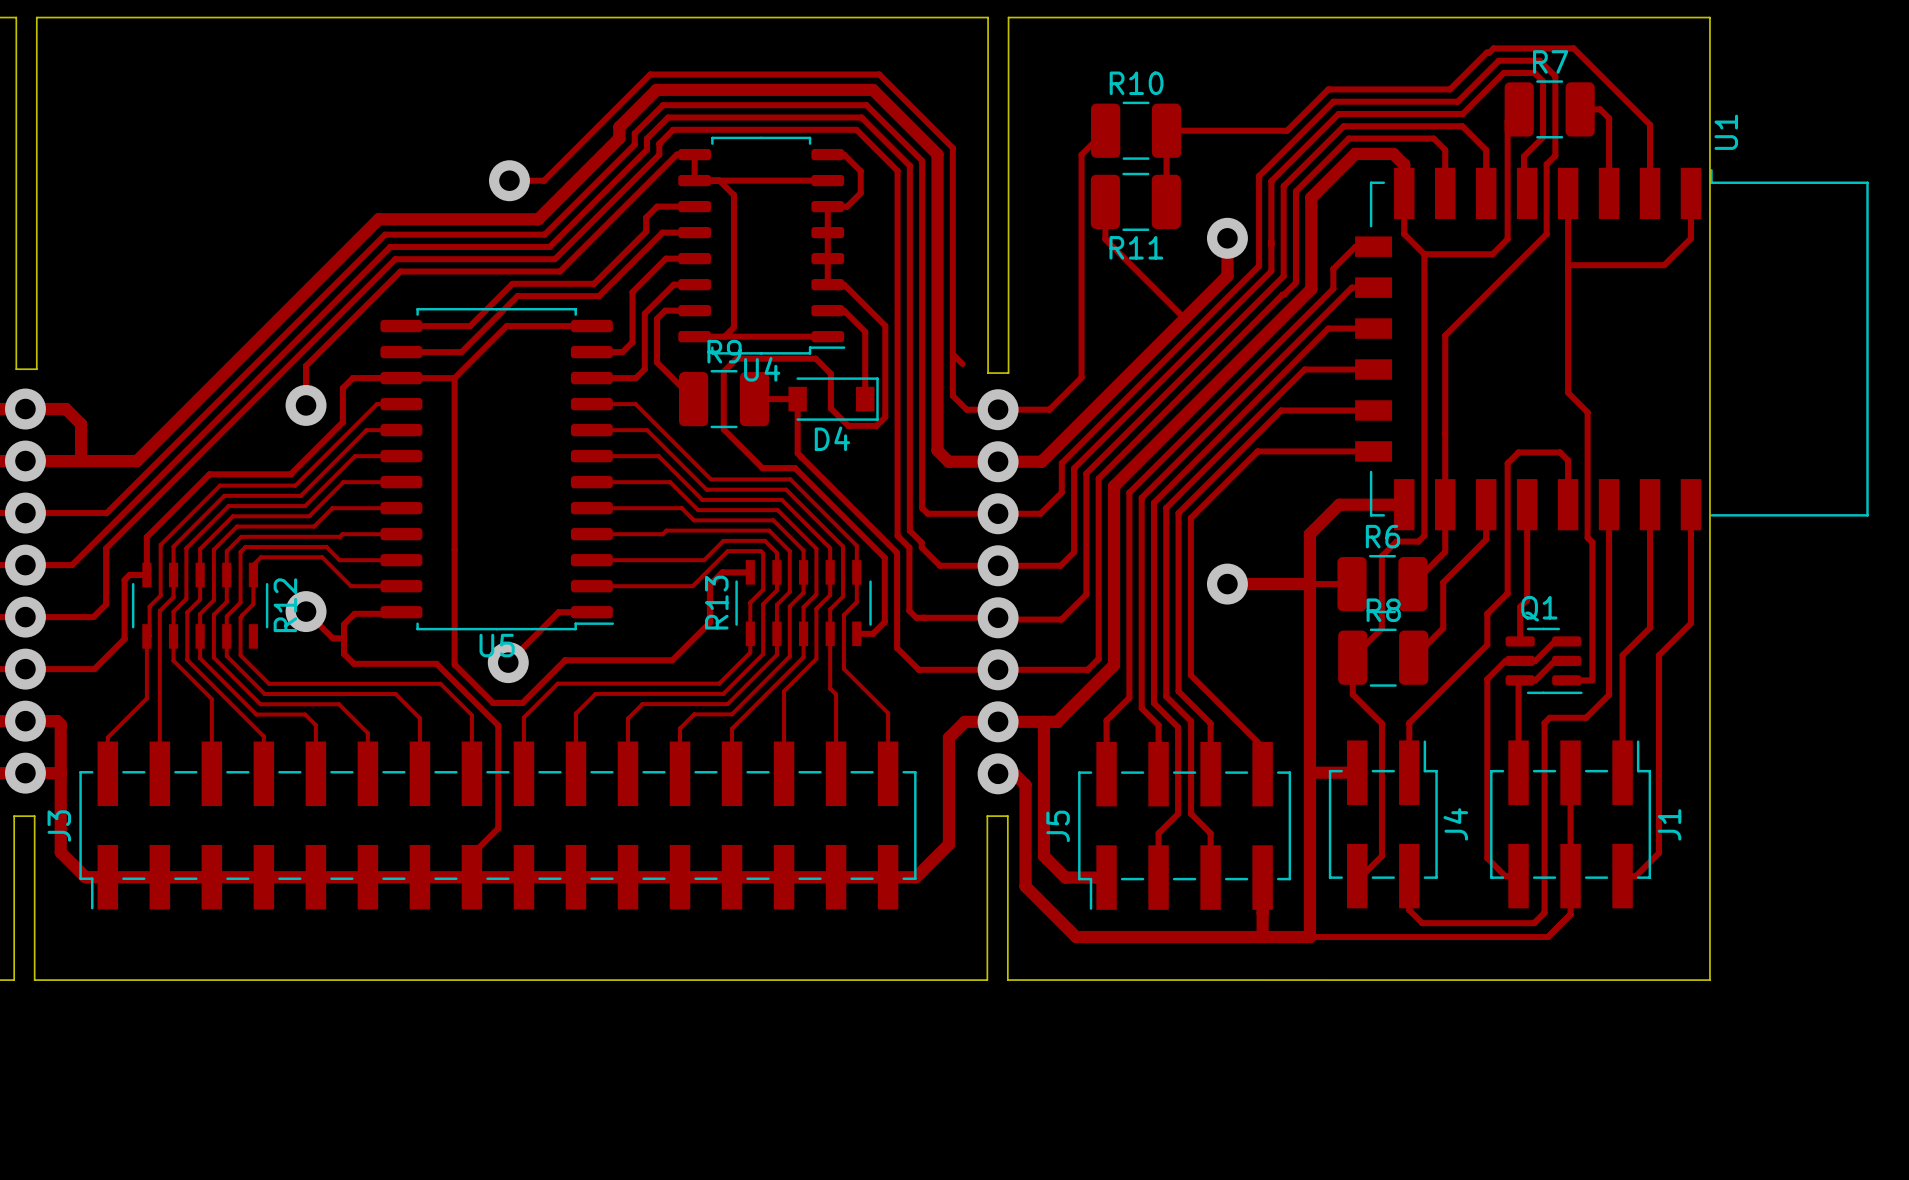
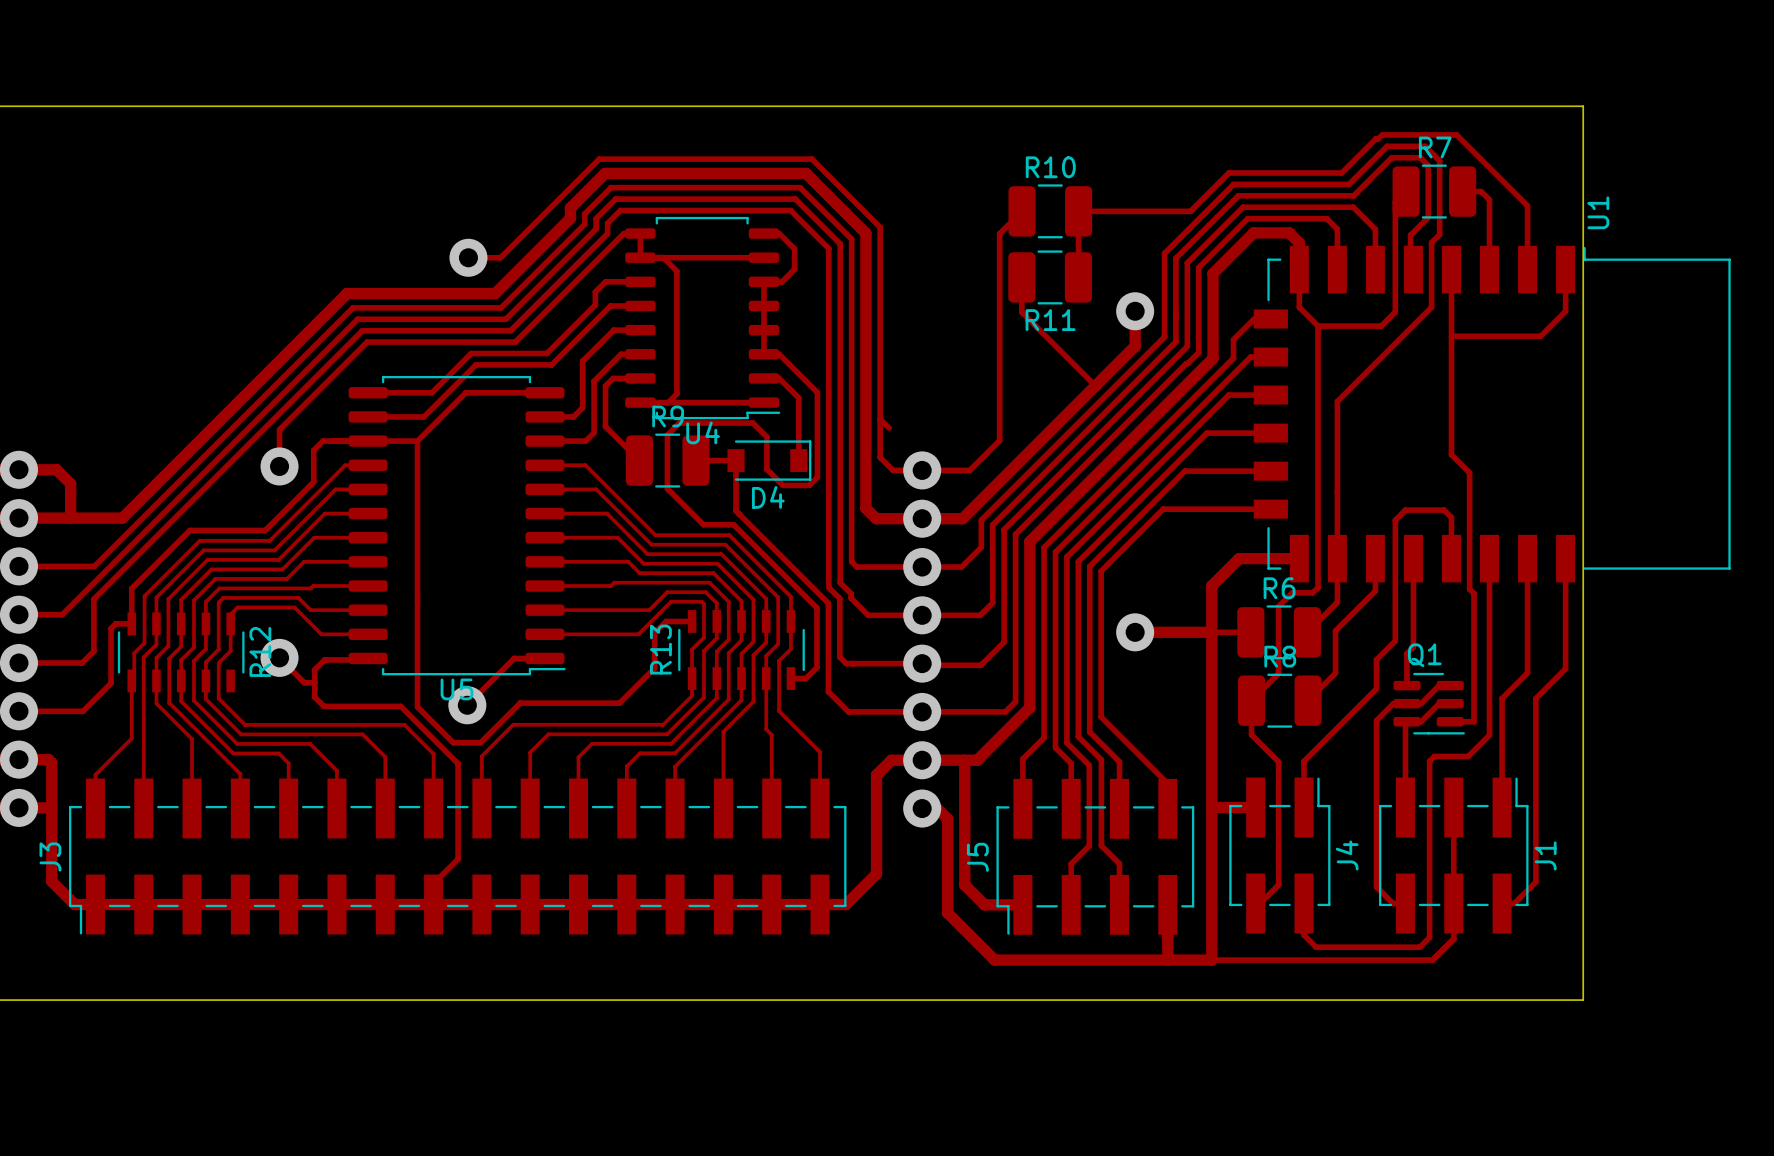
board edge: (16, 17) (16, 369) (36, 369) (36, 17) -> (10, 106) (29, 106)
board edge: (988, 17) (988, 373) (1008, 373) (1008, 17) -> (912, 106) (931, 106)
board edge: (14, 980) (14, 816) (34, 816) (34, 980) -> (8, 1000) (27, 1000)
board edge: (987, 980) (987, 816) (1007, 816) (1007, 980) (1709, 980) -> (912, 1000) (1583, 1000)

